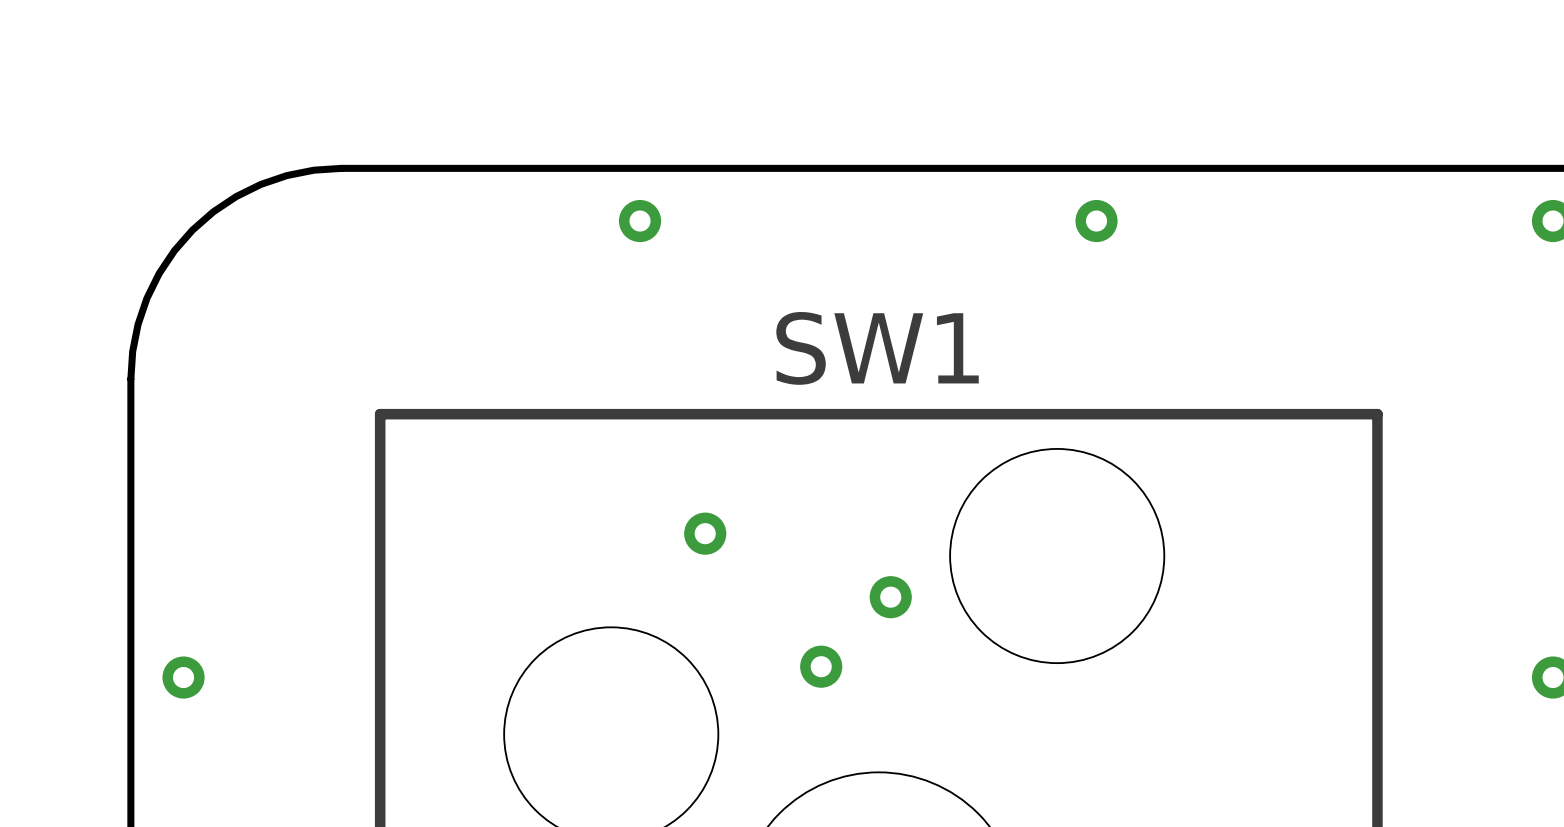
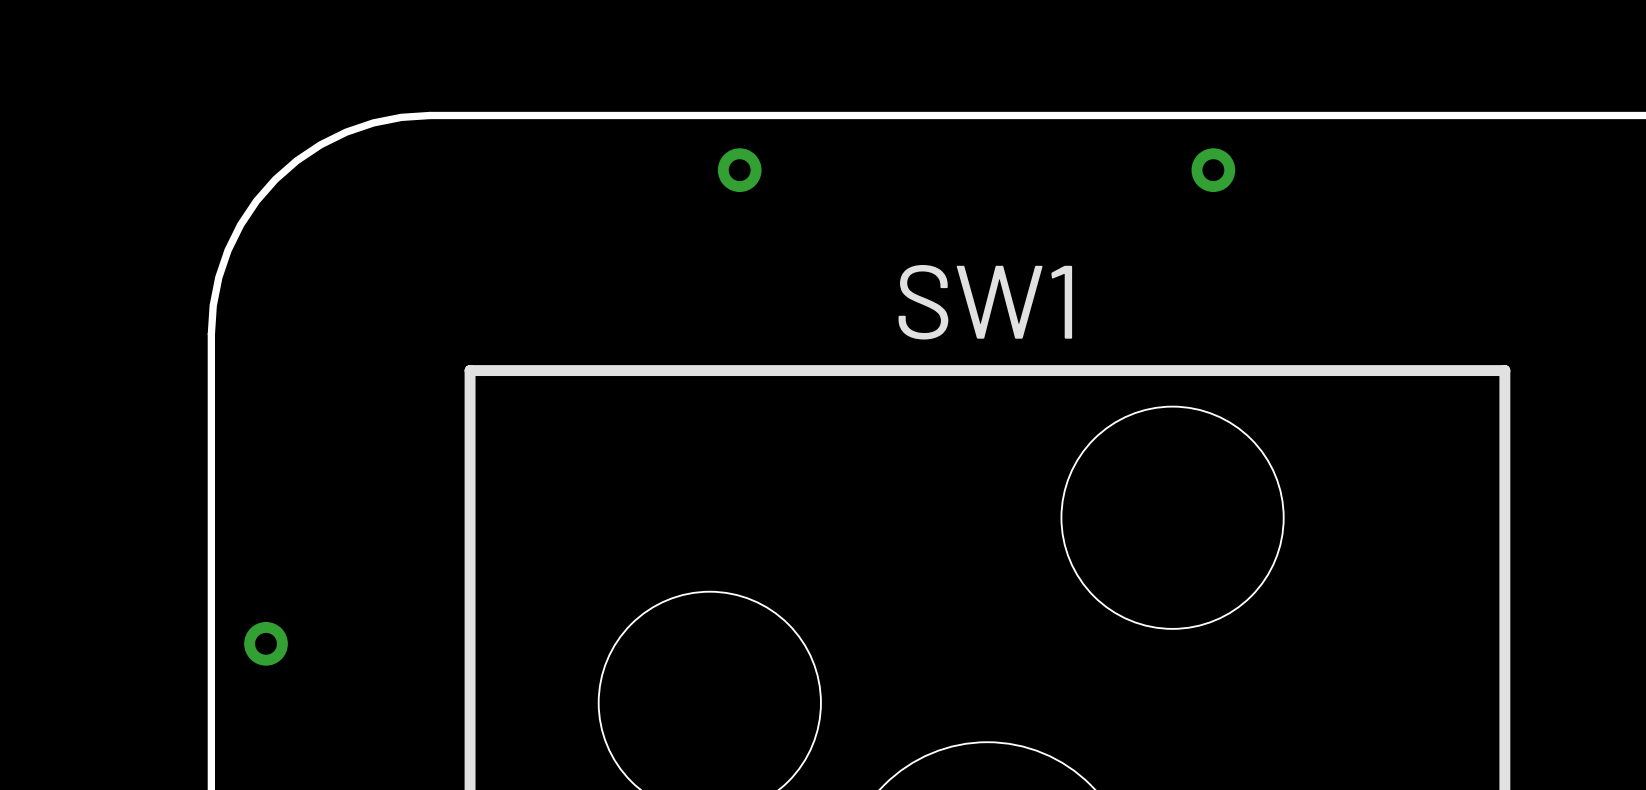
via: (705, 533) -> none
via: (890, 597) -> none
via: (821, 666) -> none

